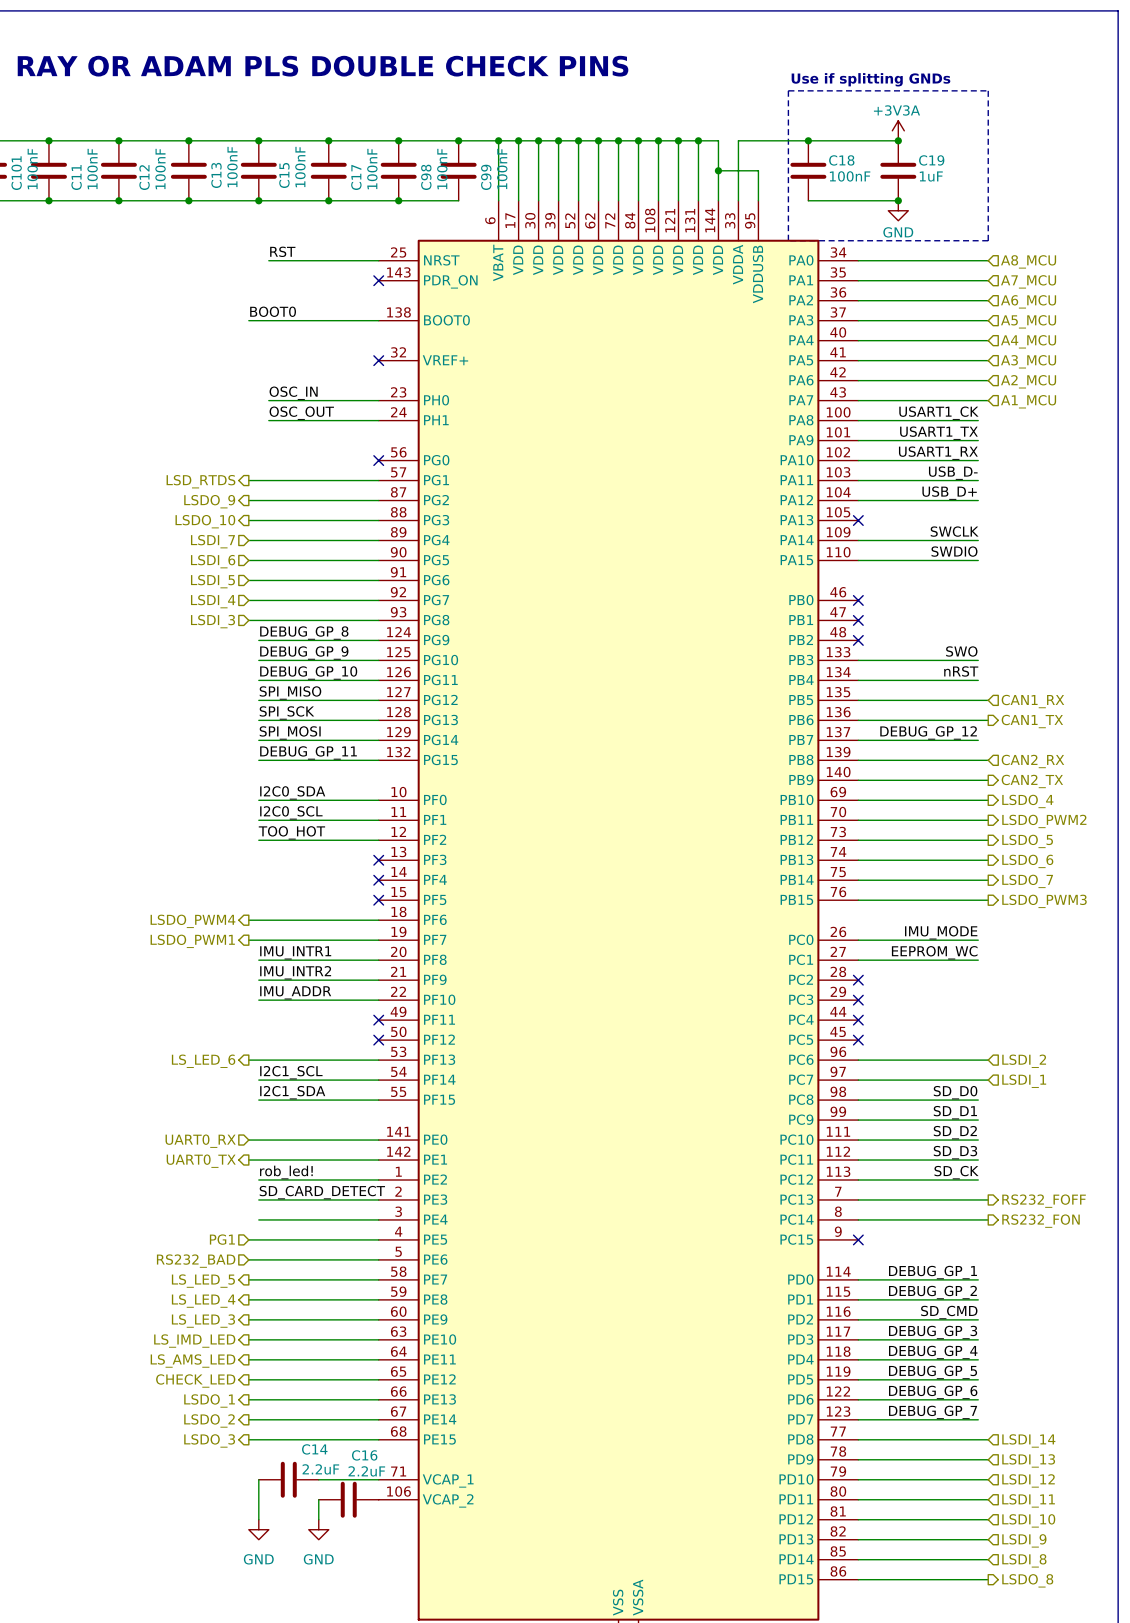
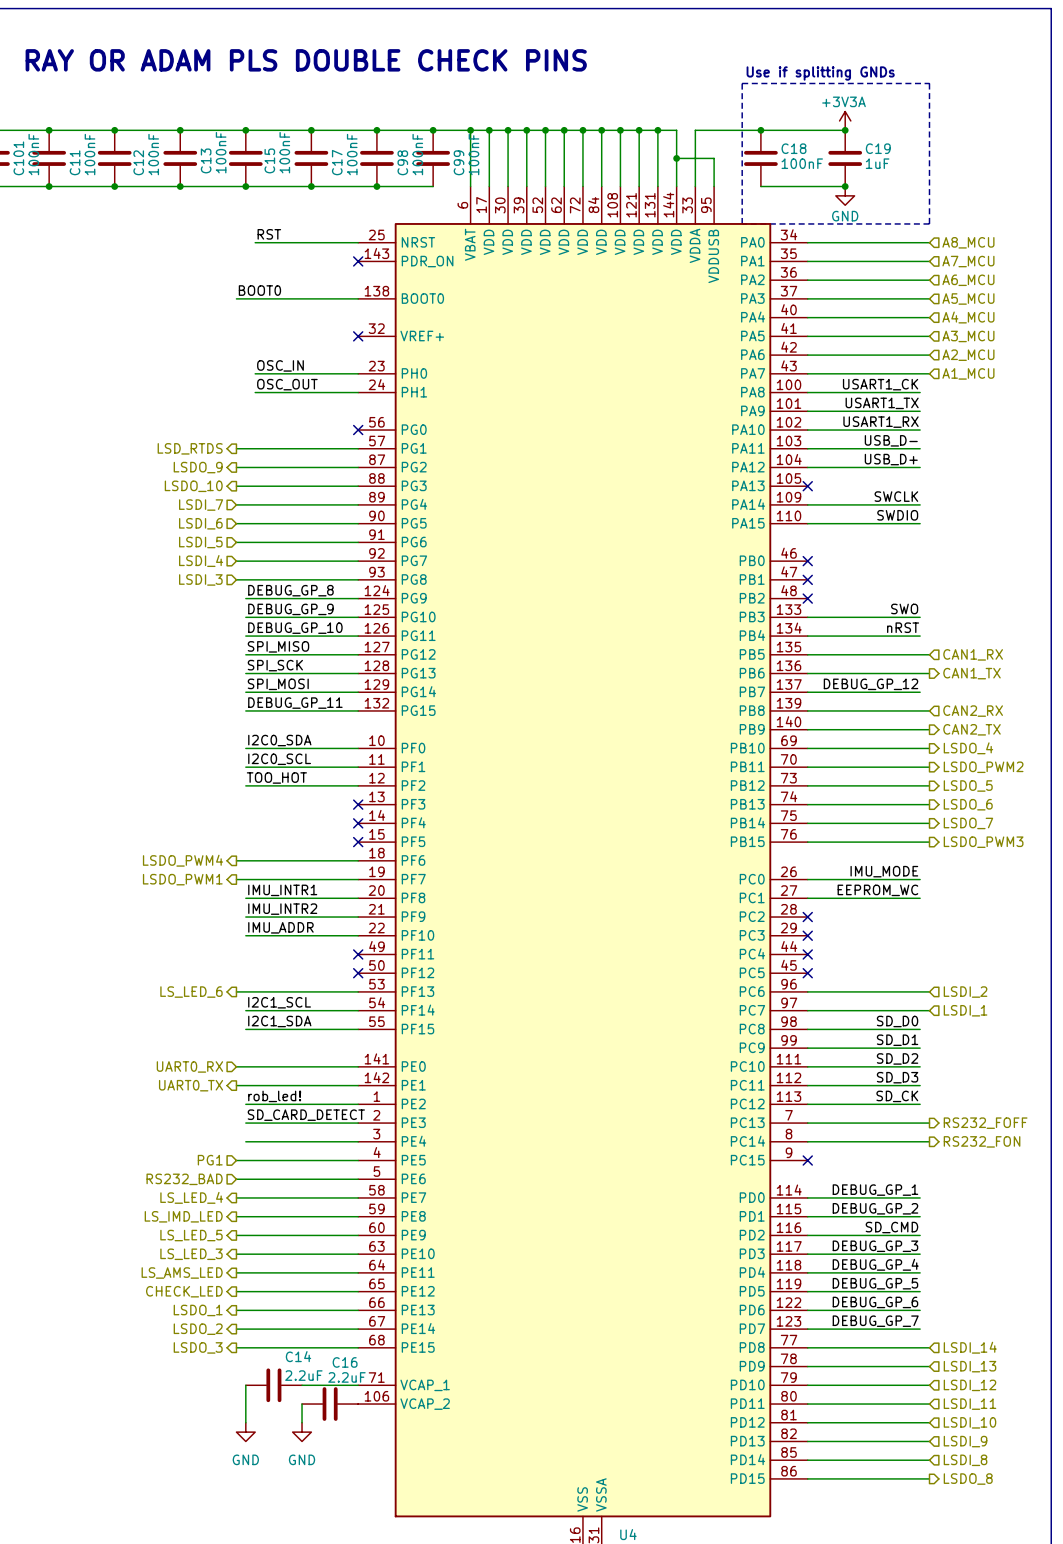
hierarchical label: LS_LED_5 (203, 1281) -> LS_LED_4 (191, 1197)
hierarchical label: LS_LED_4 (203, 1301) -> LS_IMD_LED (183, 1216)
hierarchical label: LS_LED_3 (203, 1321) -> LS_LED_5 (191, 1235)
hierarchical label: LS_IMD_LED (194, 1341) -> LS_LED_3 (191, 1254)

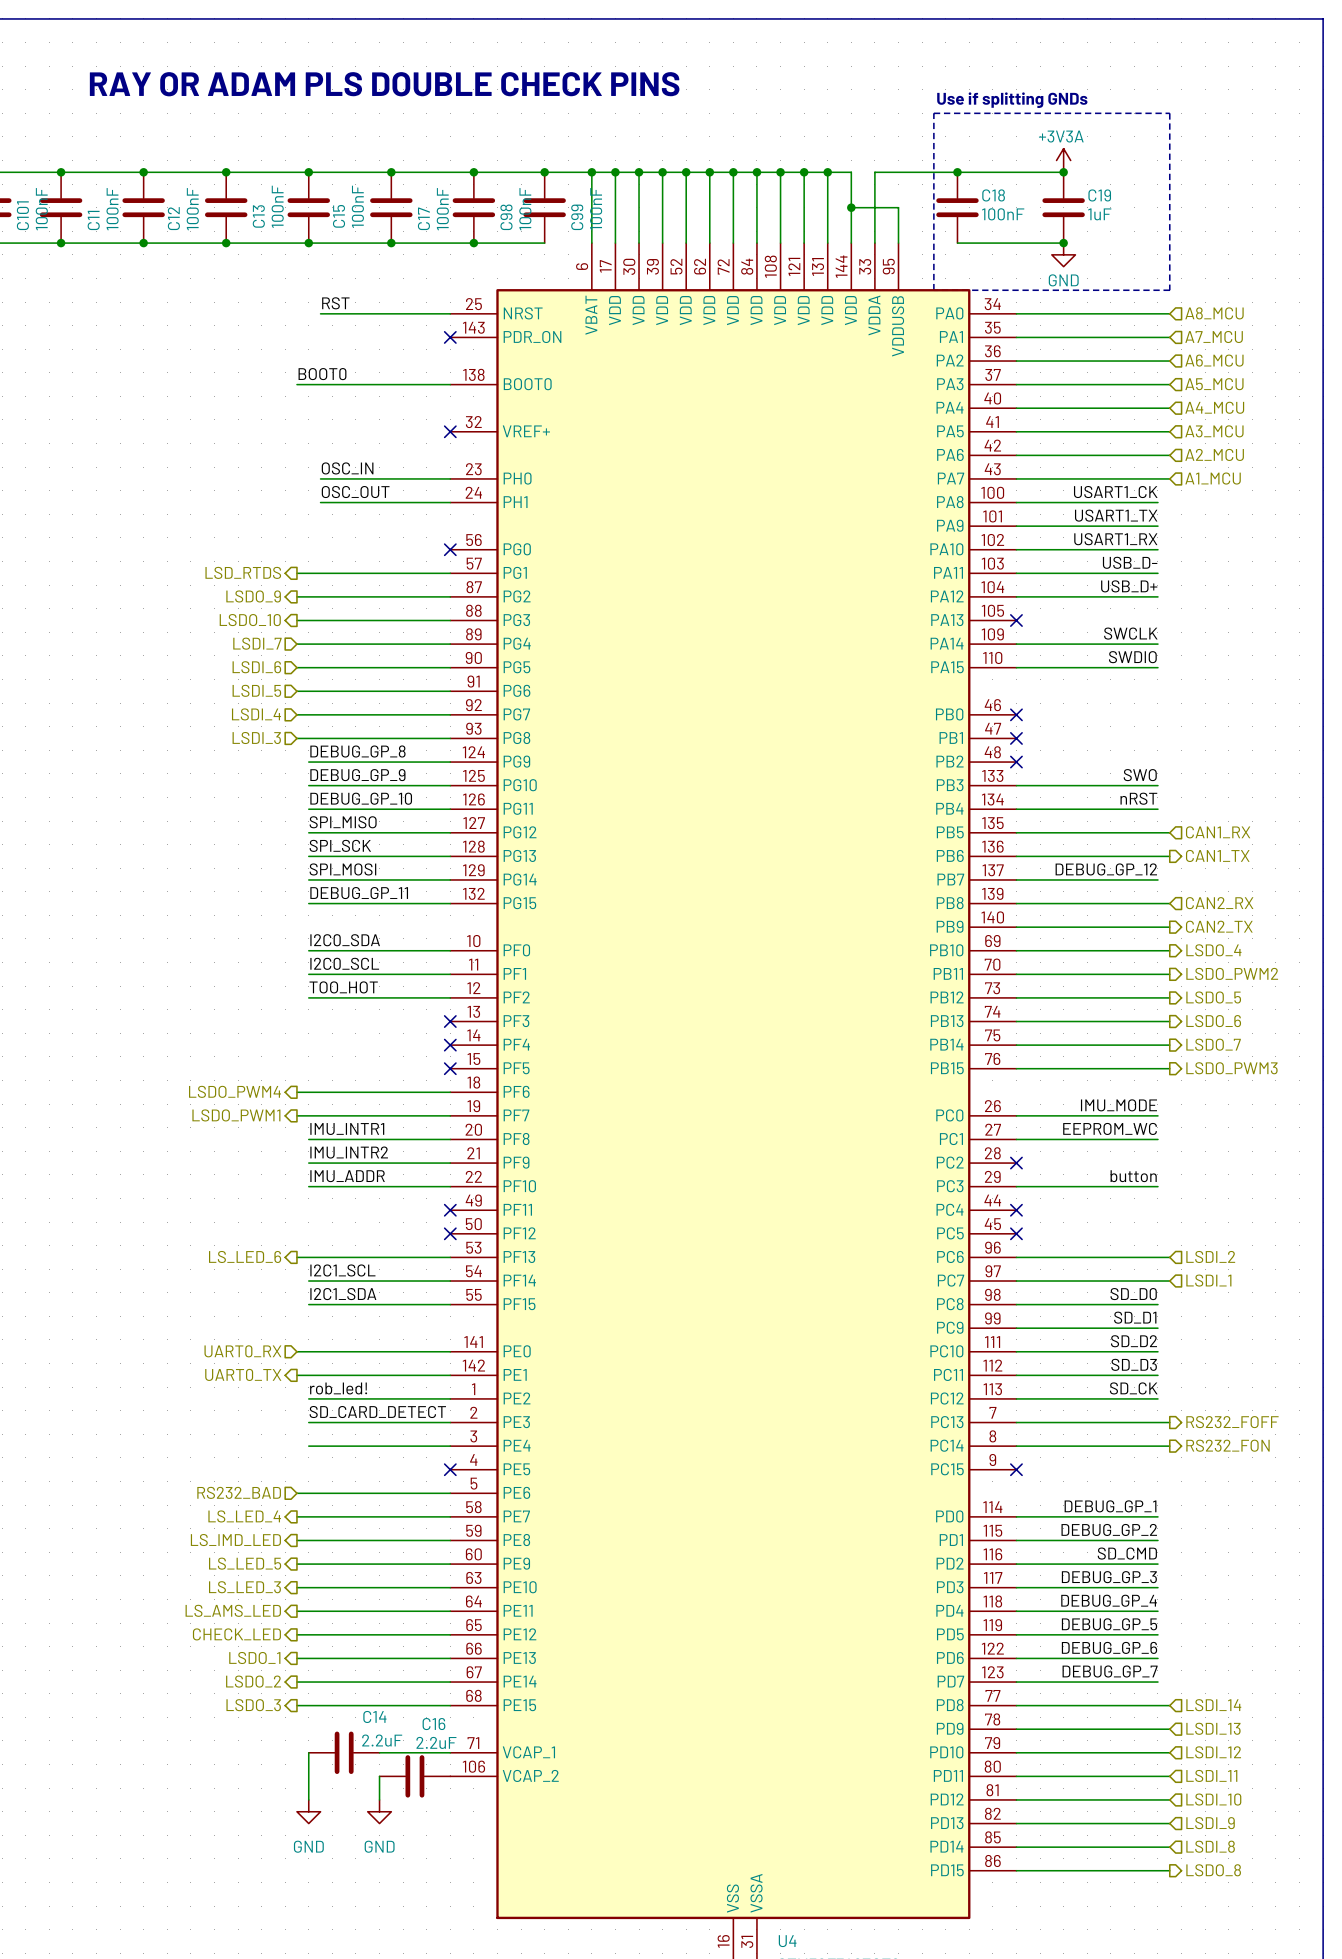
label: none -> button (1133, 1176)
wire: none -> (1016, 1186) (1157, 1186)
no-connect mark: (807, 935) -> none
hierarchical label: PG1 (210, 1160) -> none
wire: (236, 1160) (358, 1160) -> none
no-connect mark: none -> (450, 1469)

